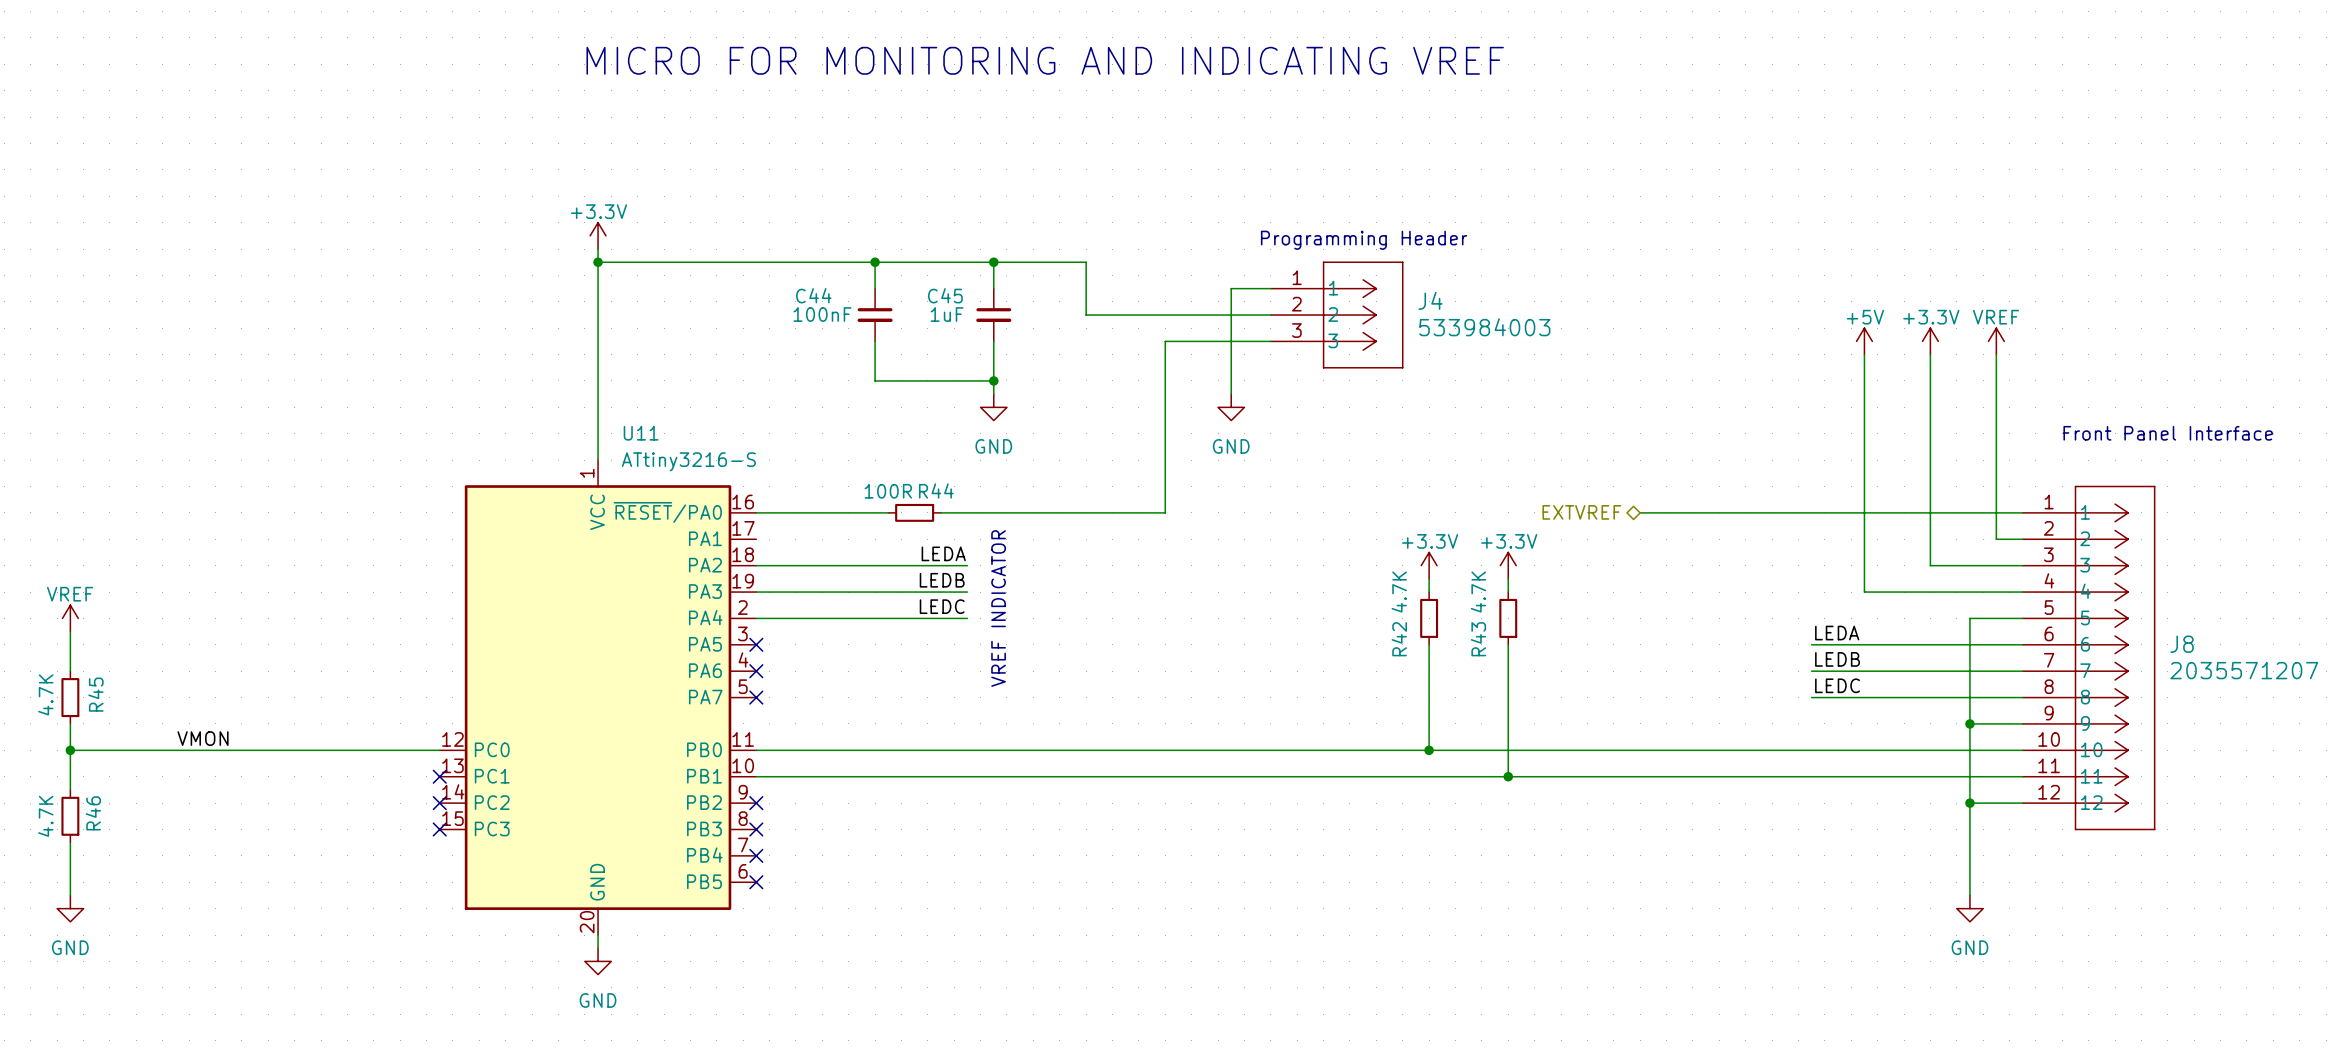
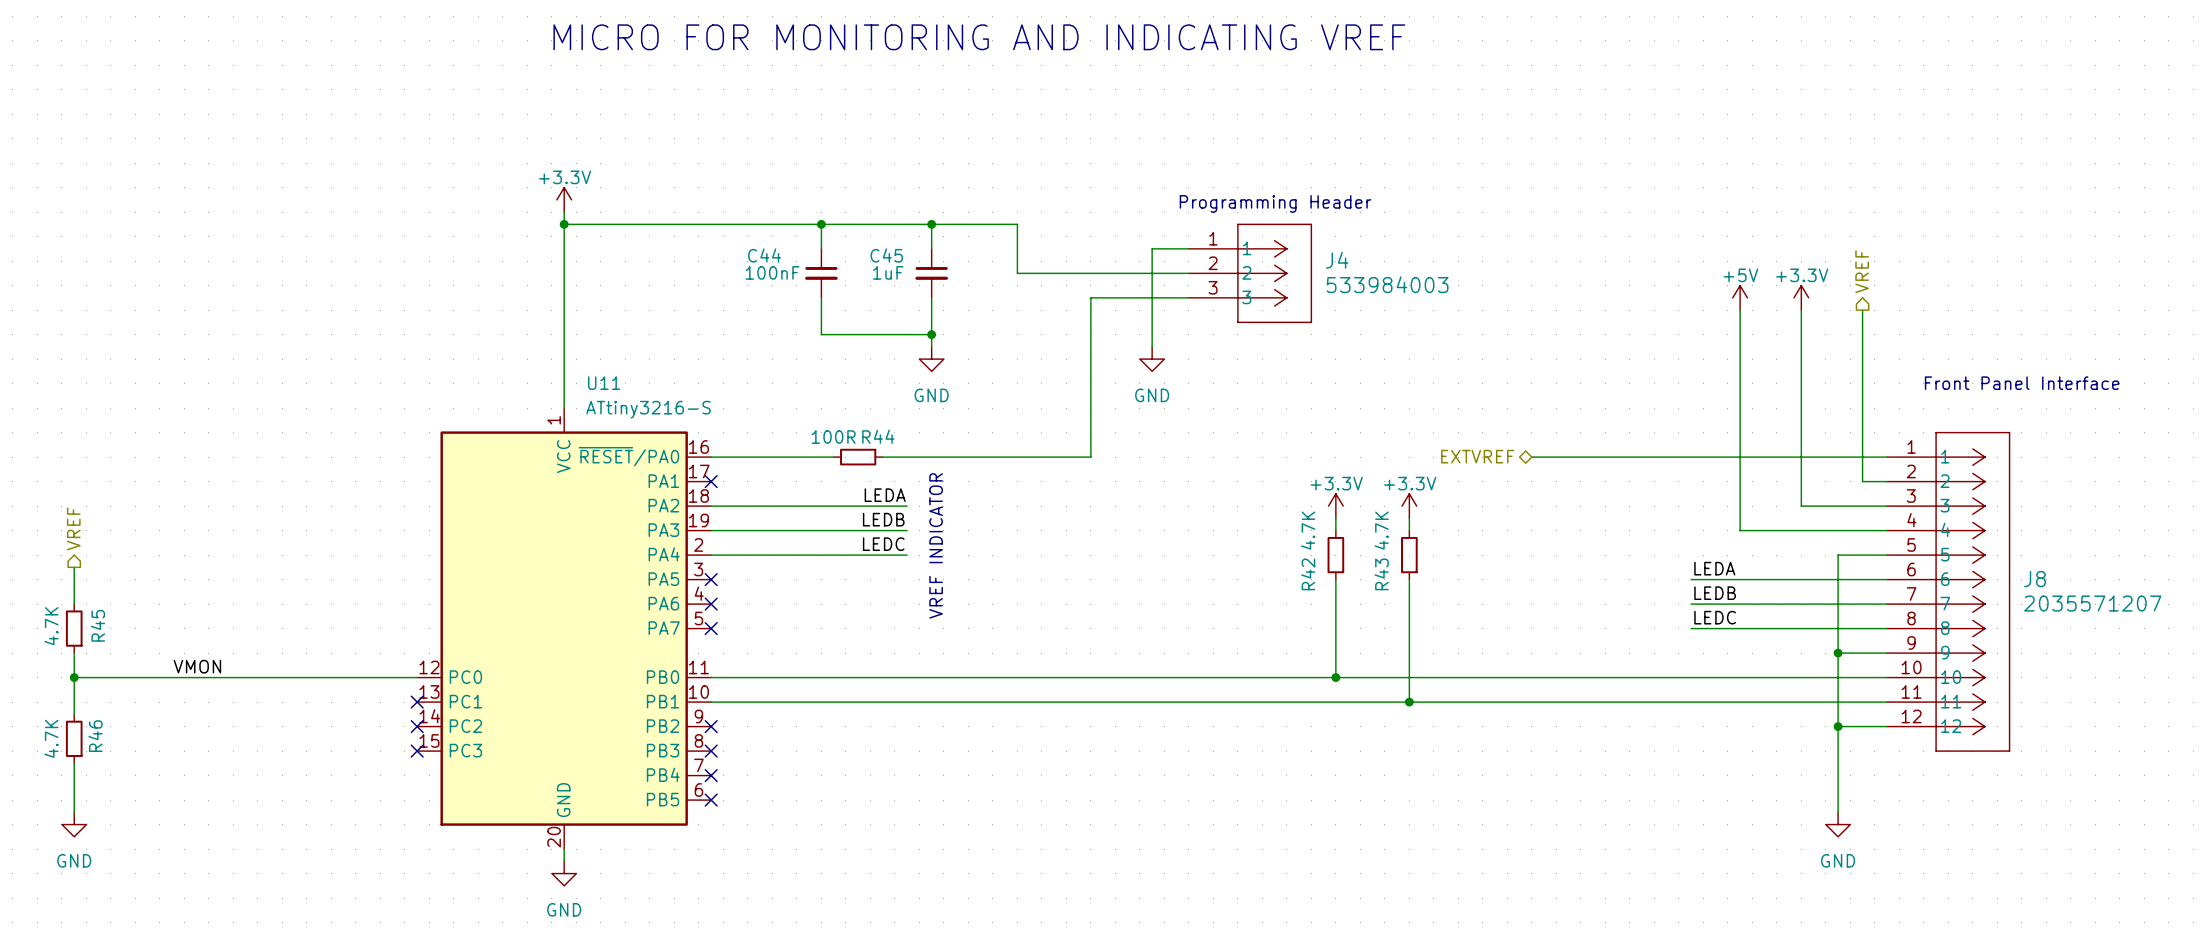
hierarchical label: none -> VREF (1862, 271)
power symbol: VREF (1996, 341) -> none
no-connect mark: none -> (711, 481)
hierarchical label: none -> VREF (73, 528)
power symbol: VREF (70, 618) -> none

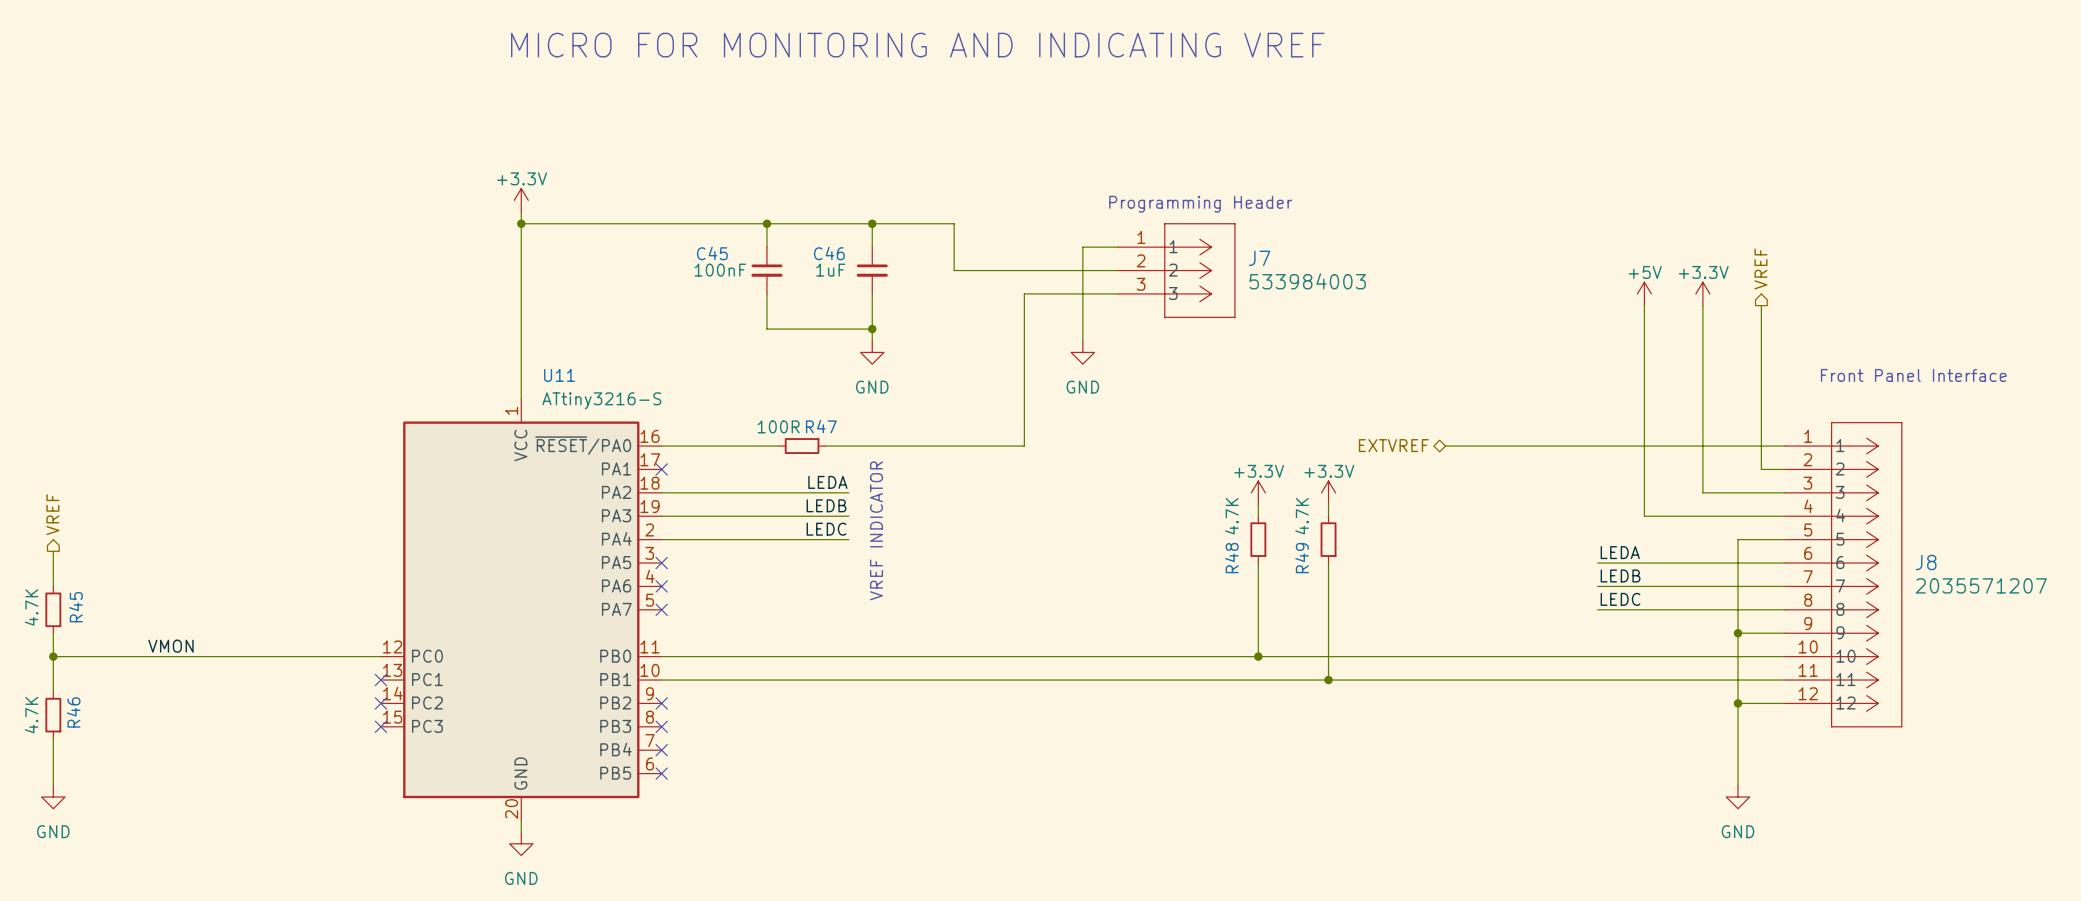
C44 name: C44 (764, 255) -> C45 (712, 253)
C45 name: C45 (886, 255) -> C46 (829, 253)
J4 name: J4 (1337, 260) -> J7 (1259, 258)
R44 name: R44 (878, 436) -> R47 (821, 426)
R42 name: R42 (1308, 574) -> R48 (1231, 558)
R43 name: R43 (1381, 574) -> R49 (1302, 558)

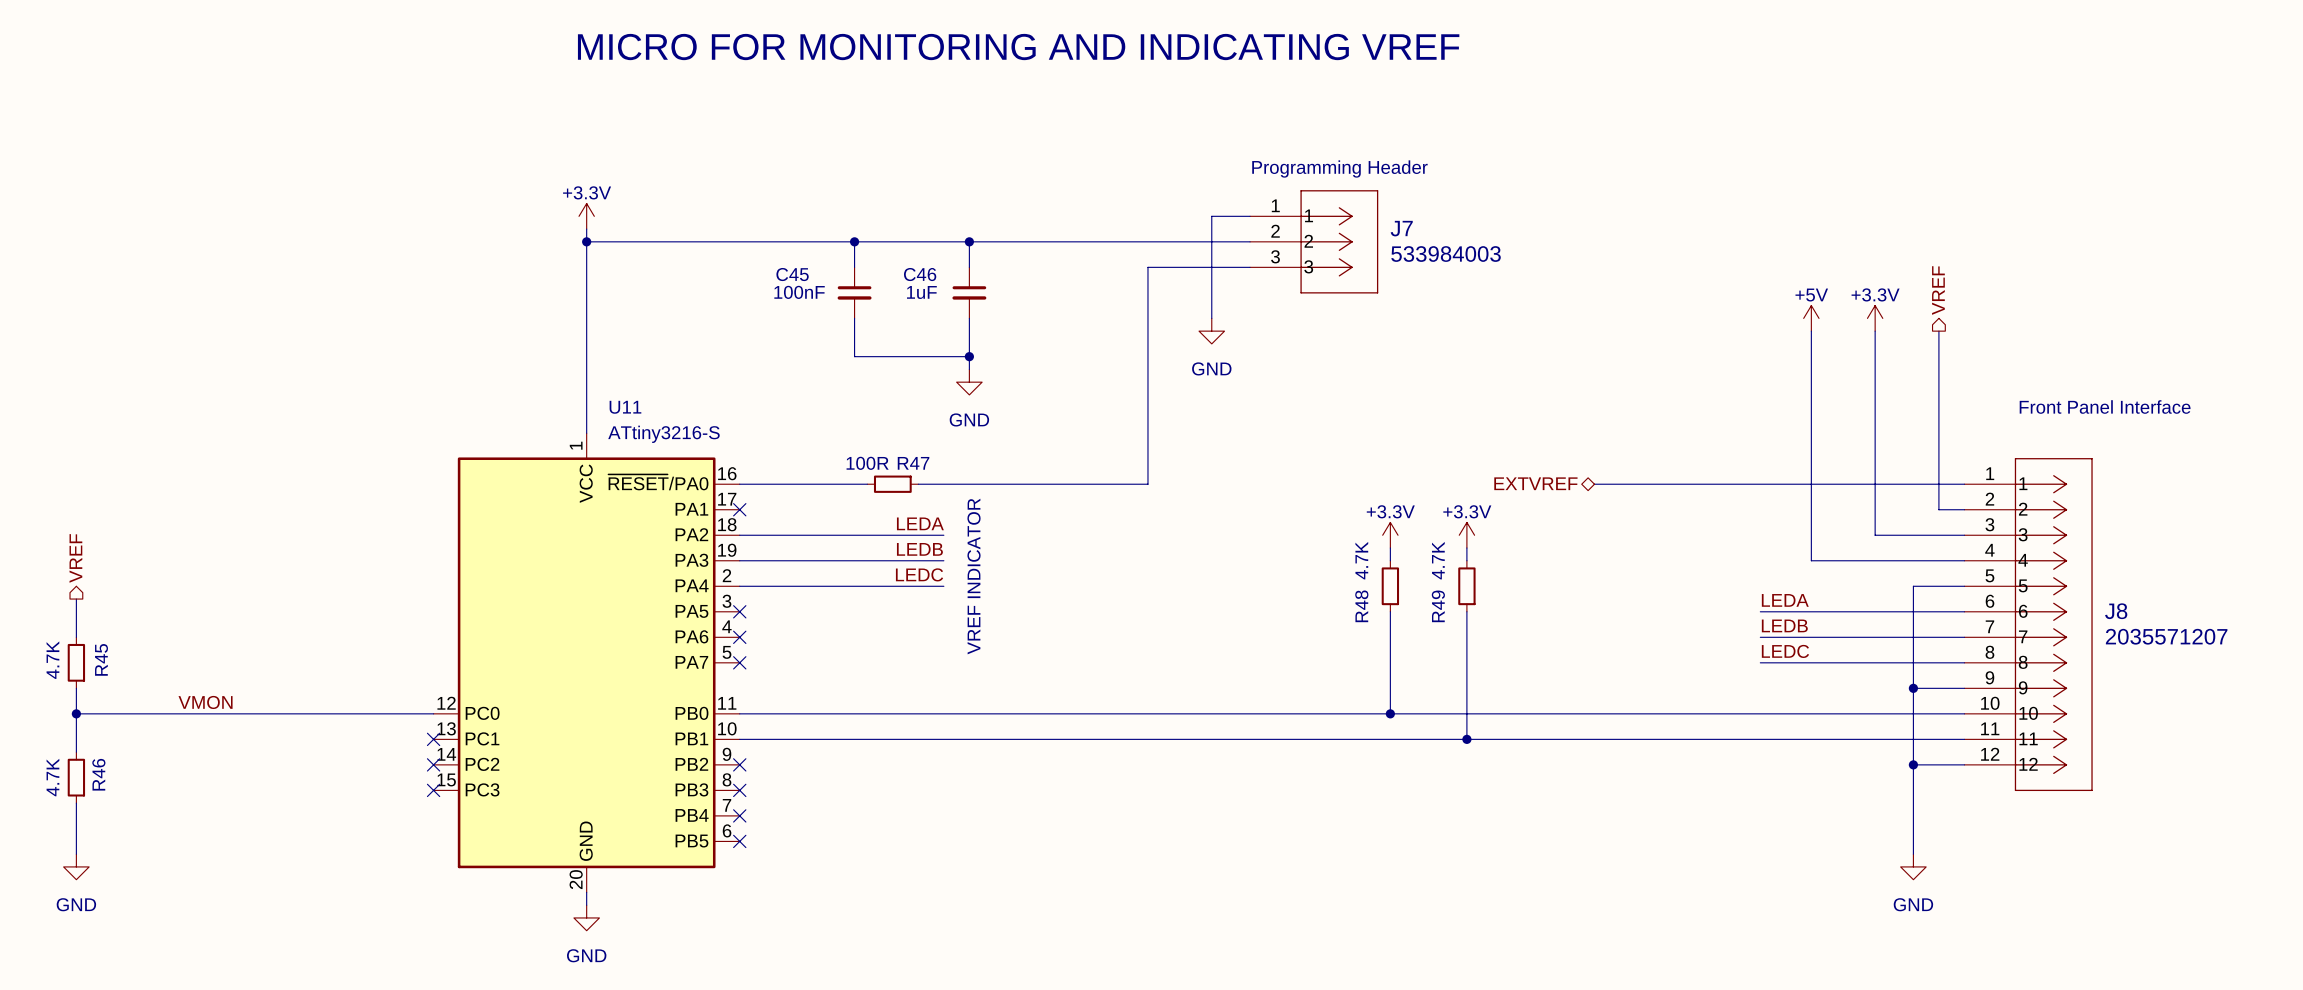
wire: none -> (1250, 216) (1211, 216) (1211, 318)
text position: Programming Header (1200, 204) -> Programming Header (1339, 168)
wire: (954, 223) (954, 270) (1117, 270) -> (1058, 241) (1250, 241)
wire: (1082, 247) (1082, 340) -> none
J7 position: (1176, 270) -> (1314, 241)
wire: (1117, 293) (1024, 293) (1024, 446) -> (1199, 267) (1147, 267) (1147, 484) (1135, 484)
power symbol position: GND (1082, 352) -> GND (1211, 331)

